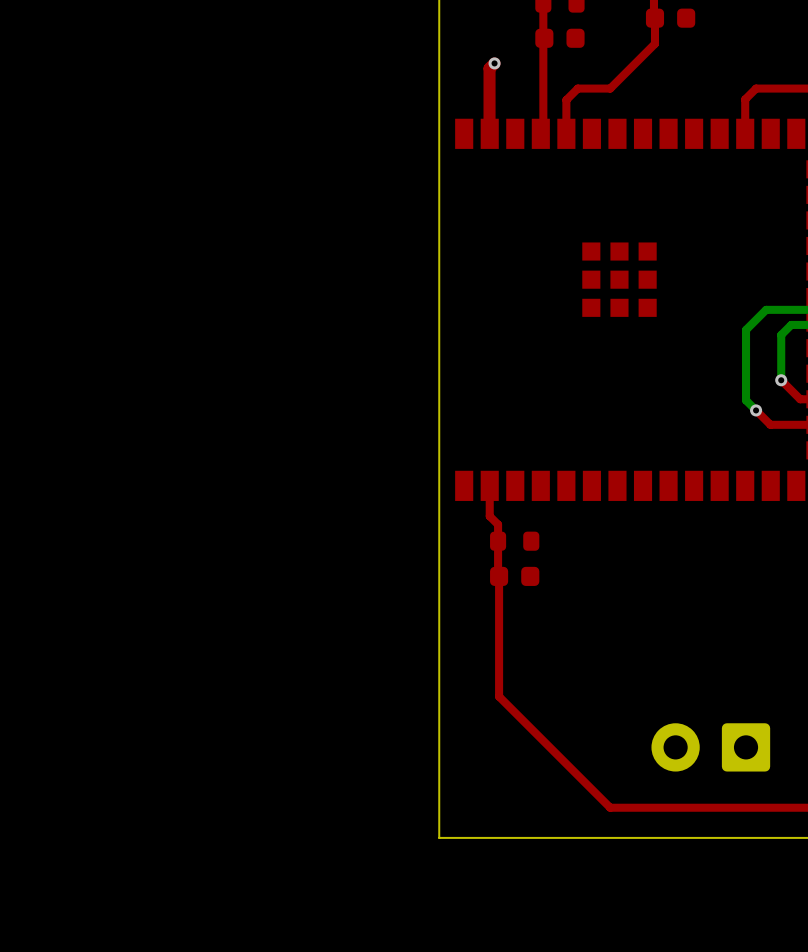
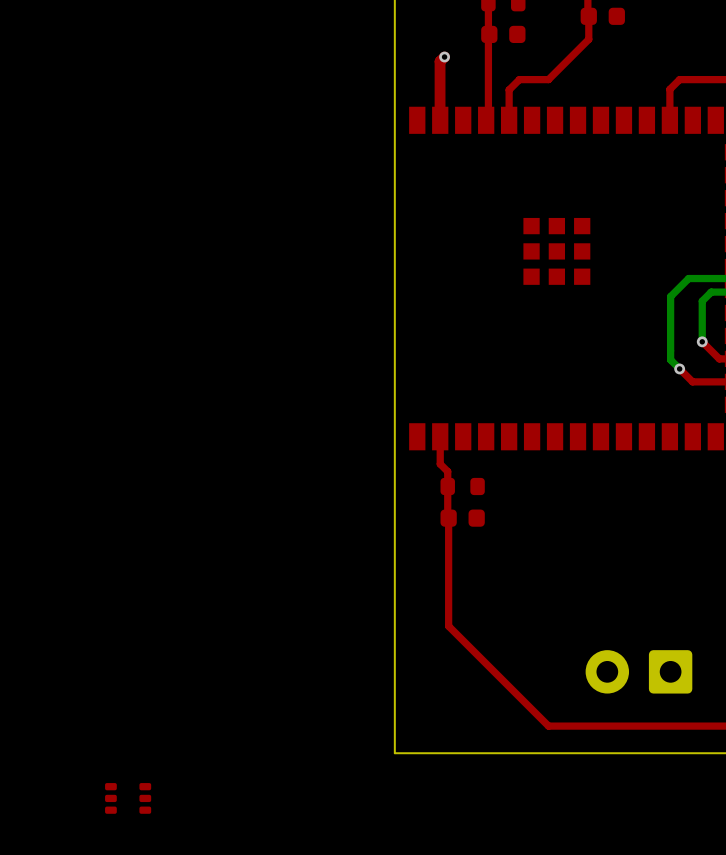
part: none -> (128, 798)

